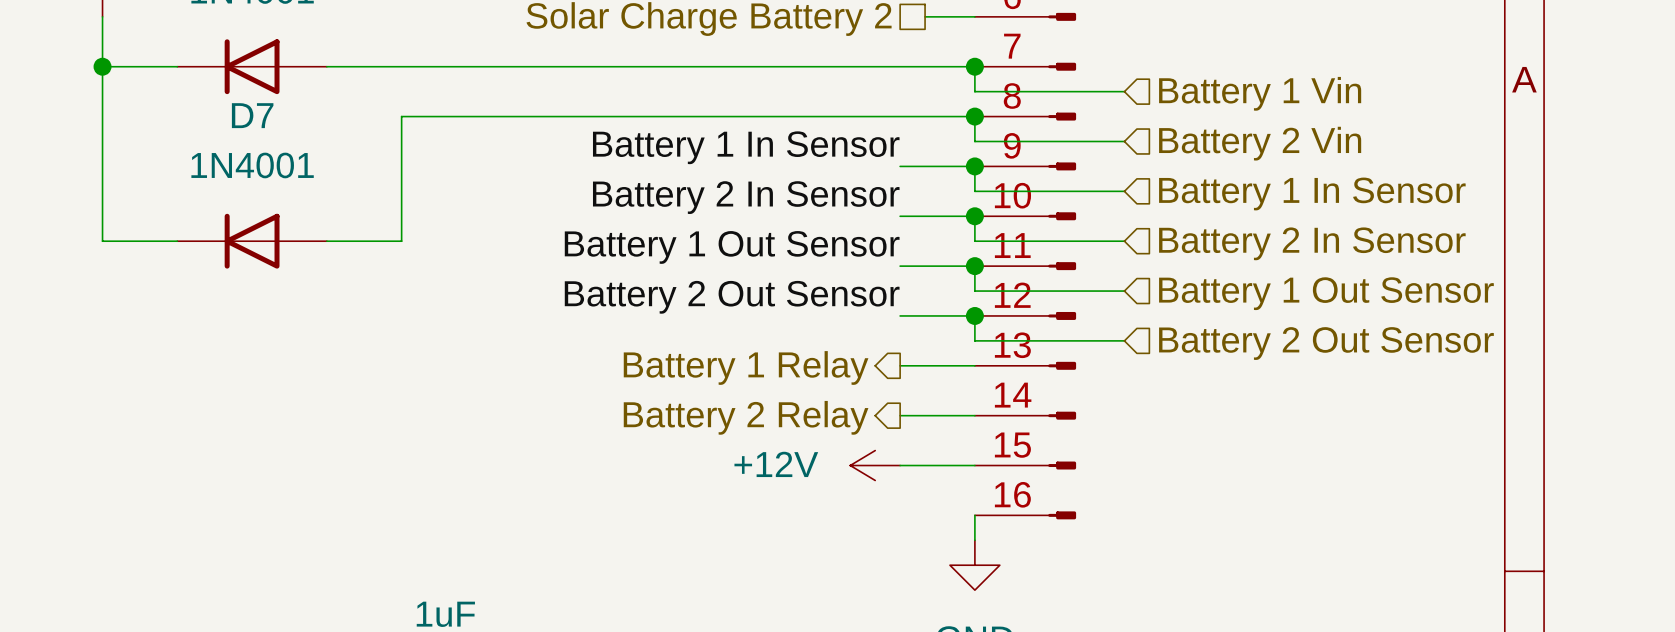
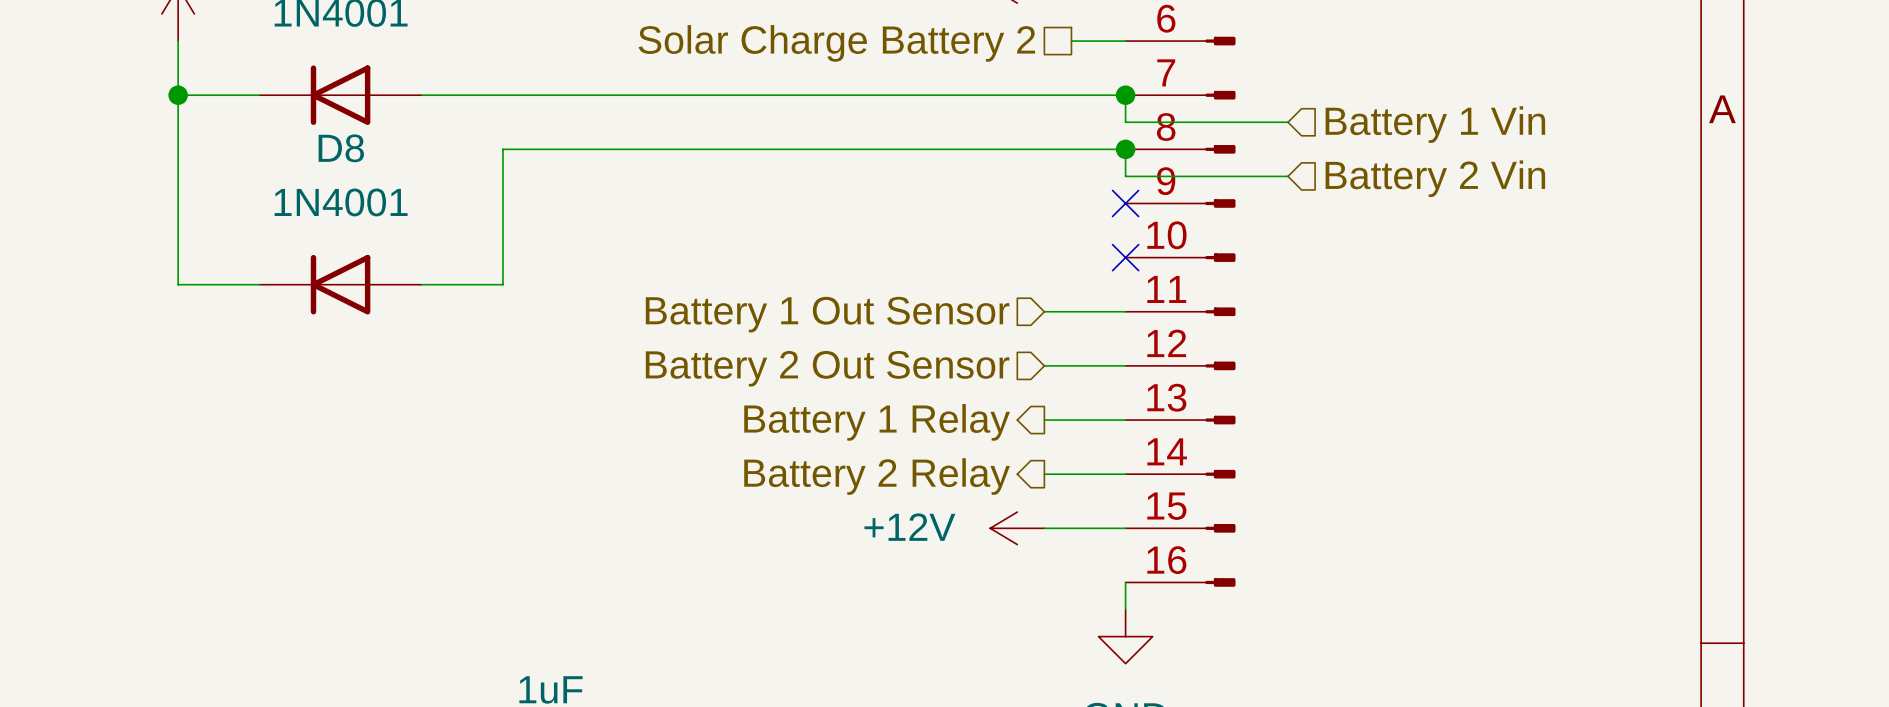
D7 name: D7 (252, 115) -> D8 (341, 148)
label: Battery 1 In Sensor (746, 147) -> none
wire: (900, 166) (974, 166) (974, 191) (1124, 191) -> none
junction: (974, 166) -> none
no-connect mark: none -> (1125, 203)
hierarchical label: Battery 1 In Sensor (1312, 193) -> none
label: Battery 2 In Sensor (746, 197) -> none
wire: (900, 216) (974, 216) (974, 241) (1124, 241) -> none
junction: (974, 216) -> none
no-connect mark: none -> (1125, 257)
hierarchical label: Battery 2 In Sensor (1312, 243) -> none
label: Battery 1 Out Sensor (732, 247) -> none
wire: (974, 266) (974, 291) (1124, 291) -> none
junction: (974, 266) -> none
hierarchical label rotation: 0° (1326, 293) -> 180° (827, 314)
hierarchical label position: Battery 1 Out Sensor (1326, 293) -> Battery 1 Out Sensor (827, 314)
label: Battery 2 Out Sensor (732, 297) -> none
wire: (974, 315) (974, 340) (1124, 340) -> none
junction: (974, 315) -> none
hierarchical label rotation: 0° (1326, 343) -> 180° (827, 368)
hierarchical label position: Battery 2 Out Sensor (1326, 343) -> Battery 2 Out Sensor (827, 368)

